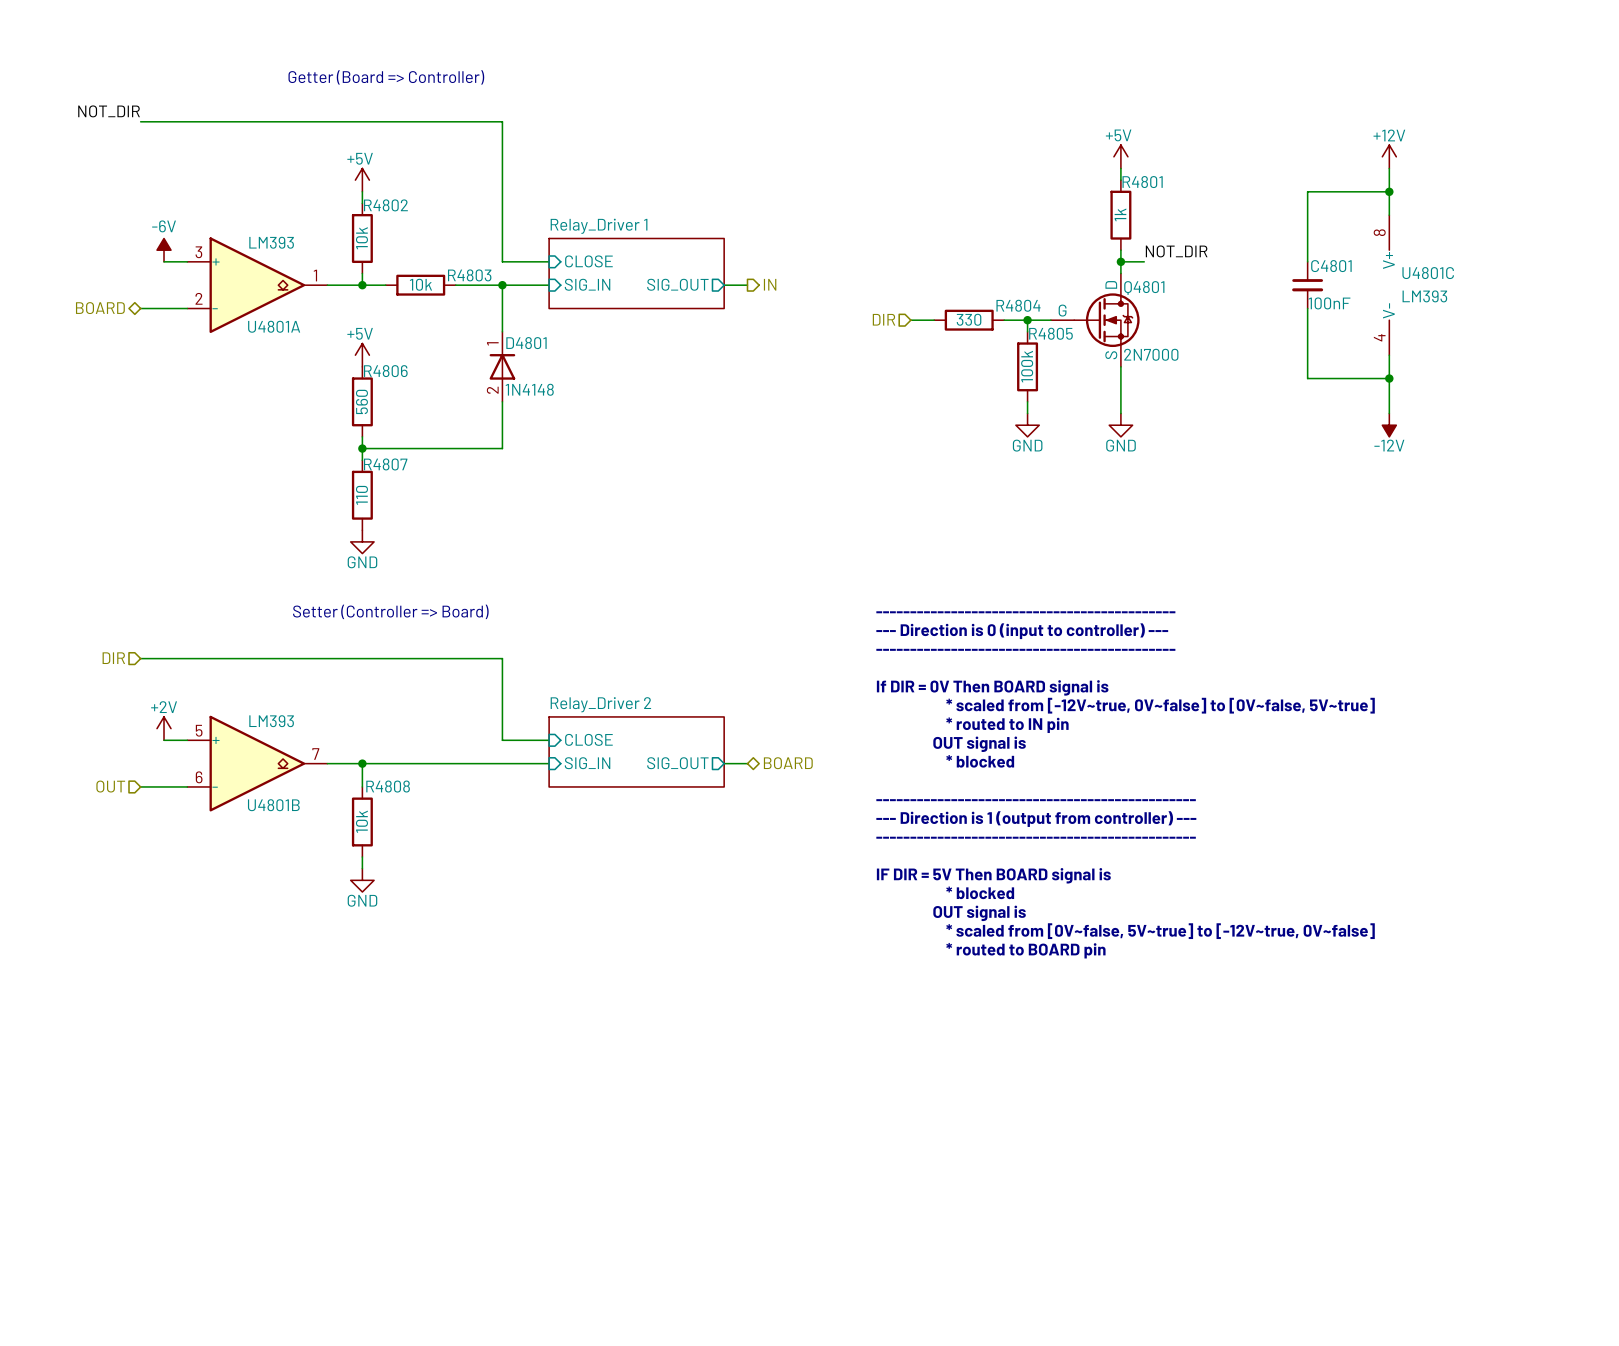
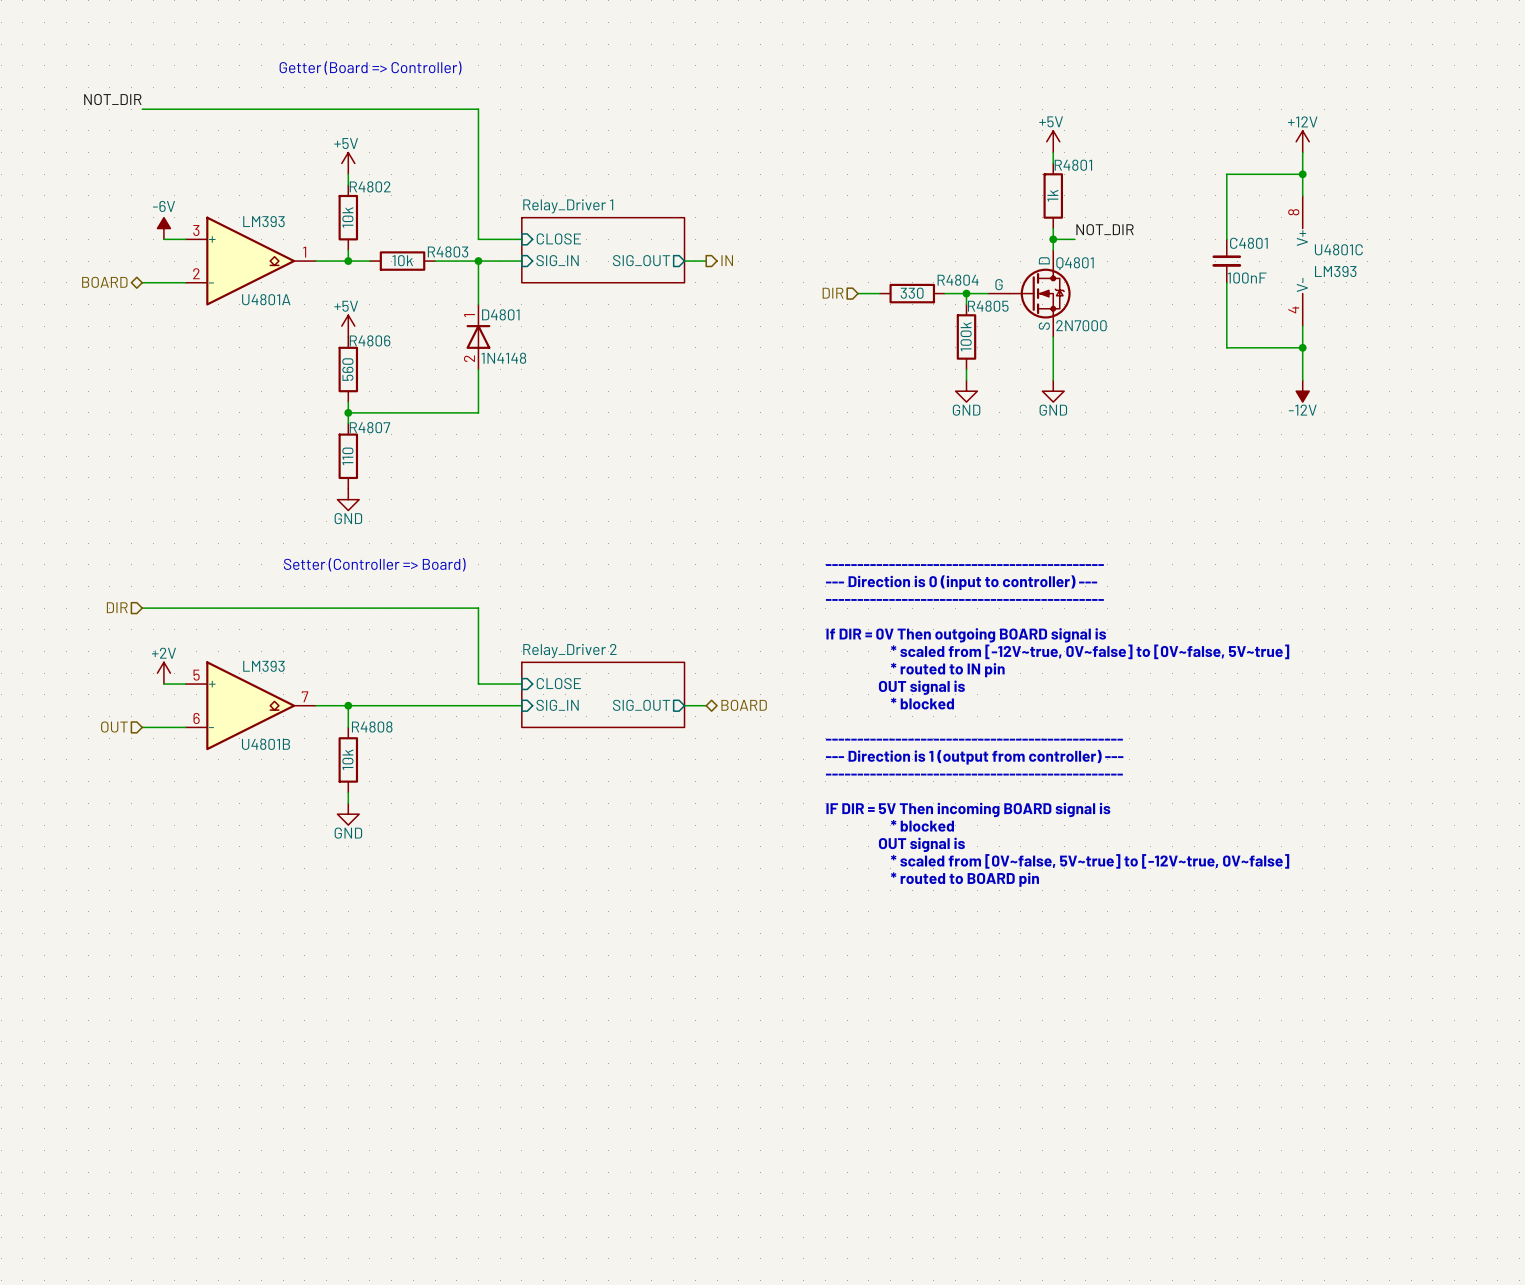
text: If DIR = 0V Then BOARD signal is (992, 687) -> If DIR = 0V Then outgoing BOARD signal is (966, 635)
text: IF DIR = 5V Then BOARD signal is (993, 875) -> IF DIR = 5V Then incoming BOARD signal is (968, 809)

